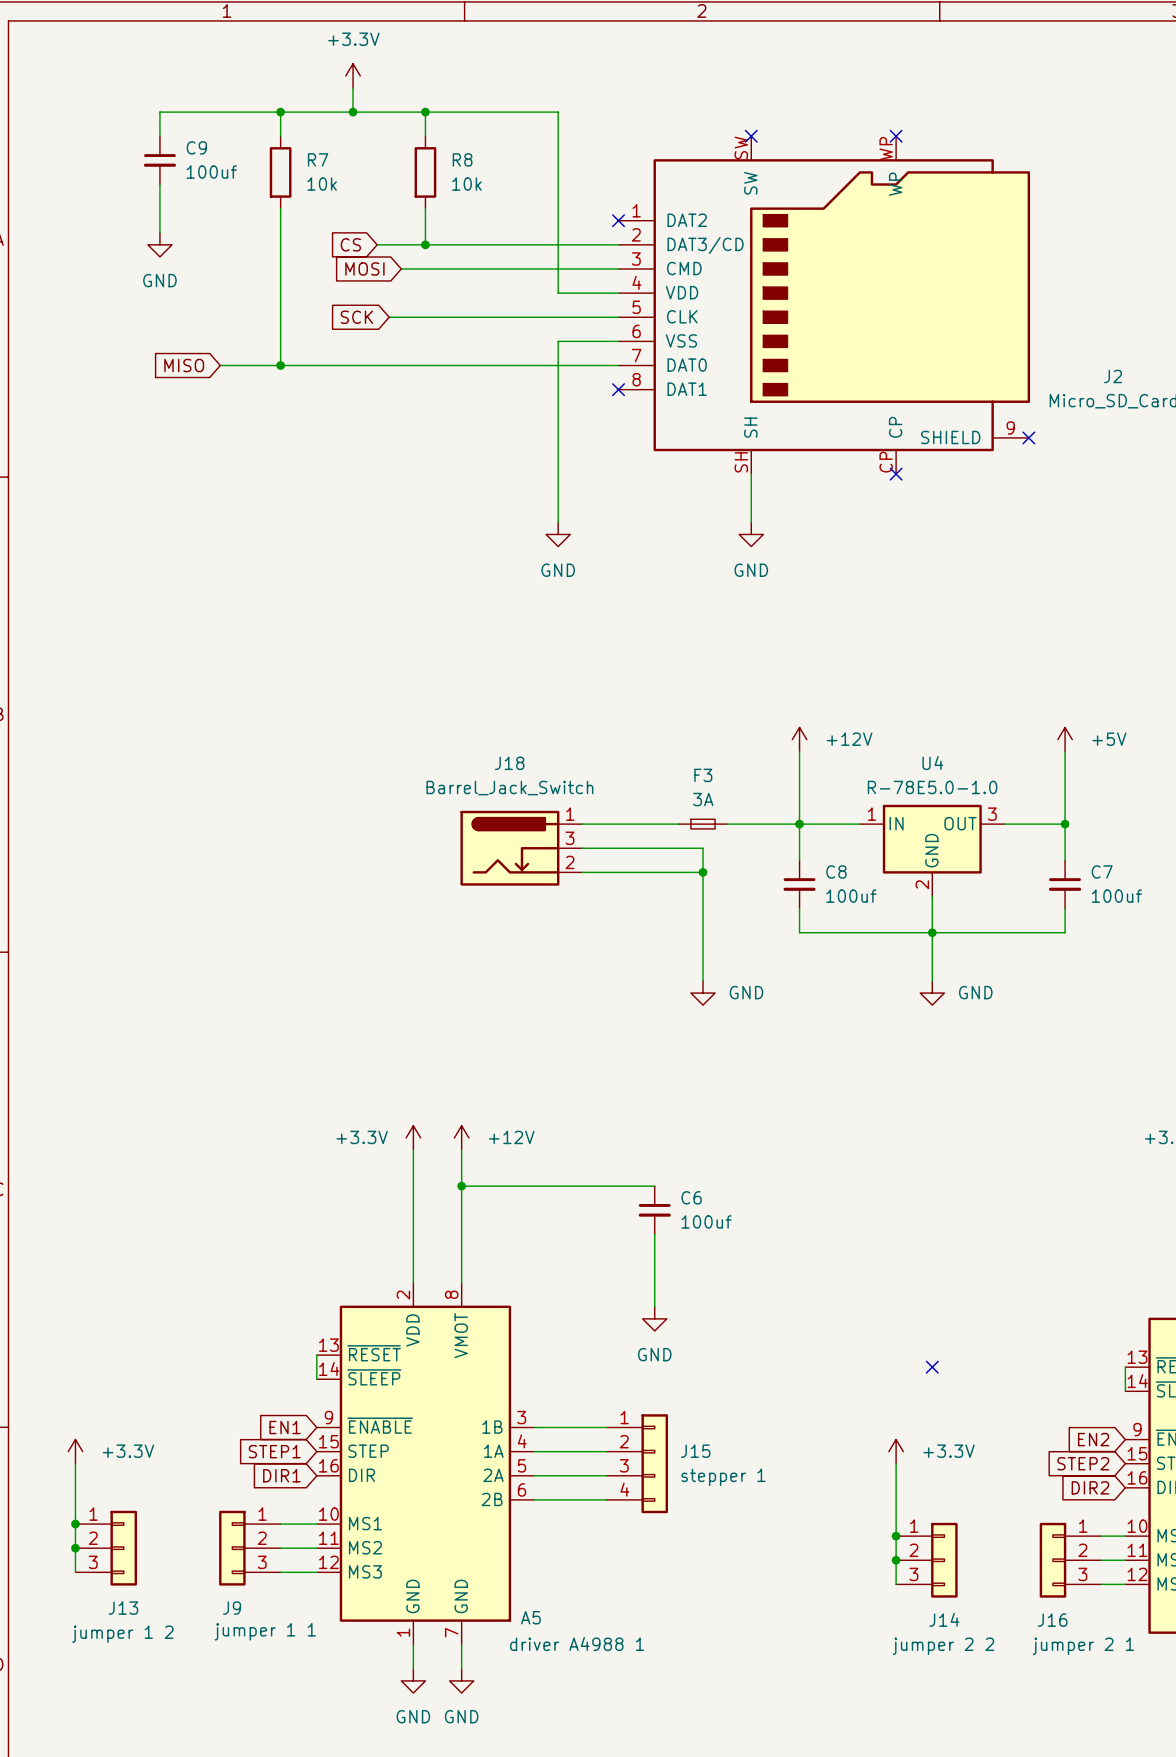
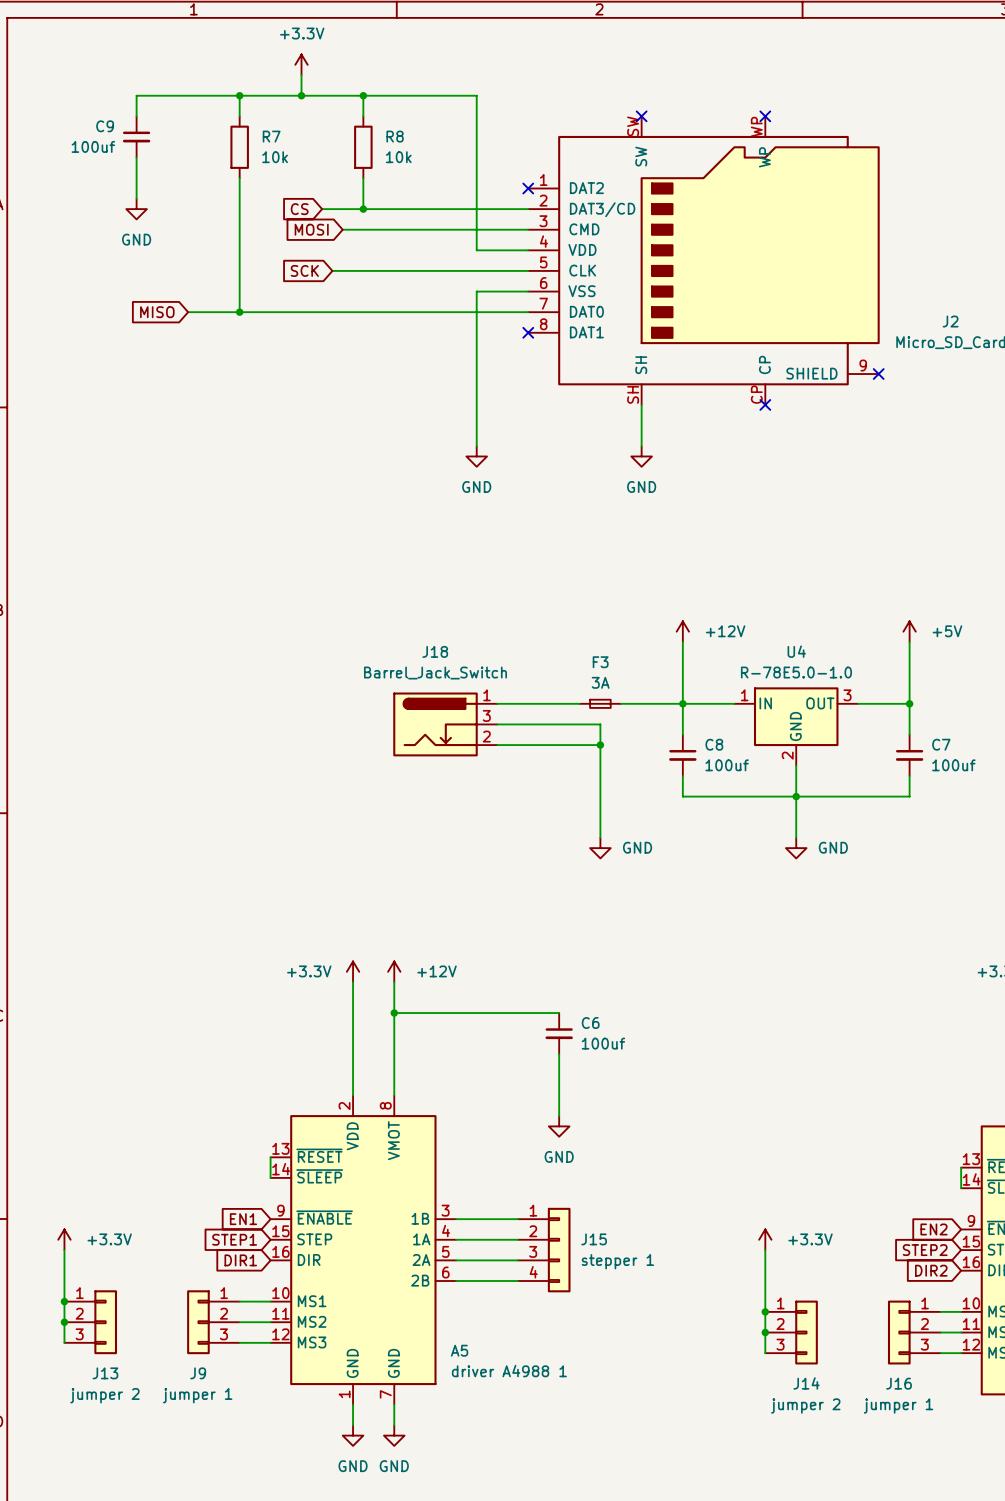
C9 name position: C9 (196, 147) -> C9 (105, 126)
C9 value position: 100uf (211, 172) -> 100uf (93, 146)
no-connect mark: (932, 1367) -> none
A5 name position: A5 (530, 1617) -> A5 (459, 1350)
J9 value: jumper 1 1 (265, 1631) -> jumper 1 (197, 1395)
J13 value: jumper 1 2 (122, 1634) -> jumper 2 (104, 1395)
A5 value position: driver A4988 1 (577, 1643) -> driver A4988 1 (509, 1371)
J14 value: jumper 2 2 (943, 1646) -> jumper 2 (805, 1406)
J16 value: jumper 2 1 (1083, 1646) -> jumper 1 (898, 1406)

